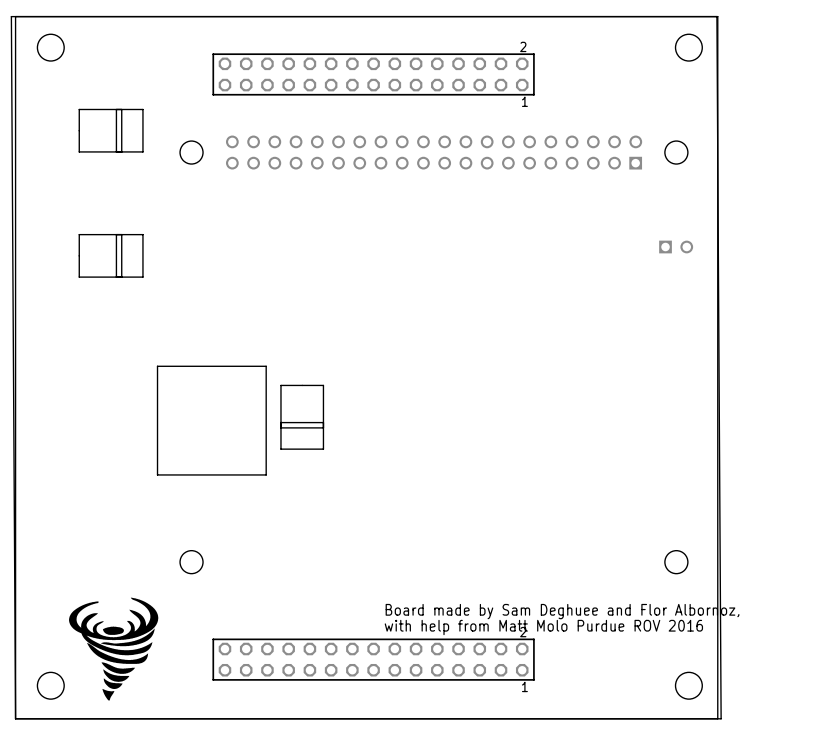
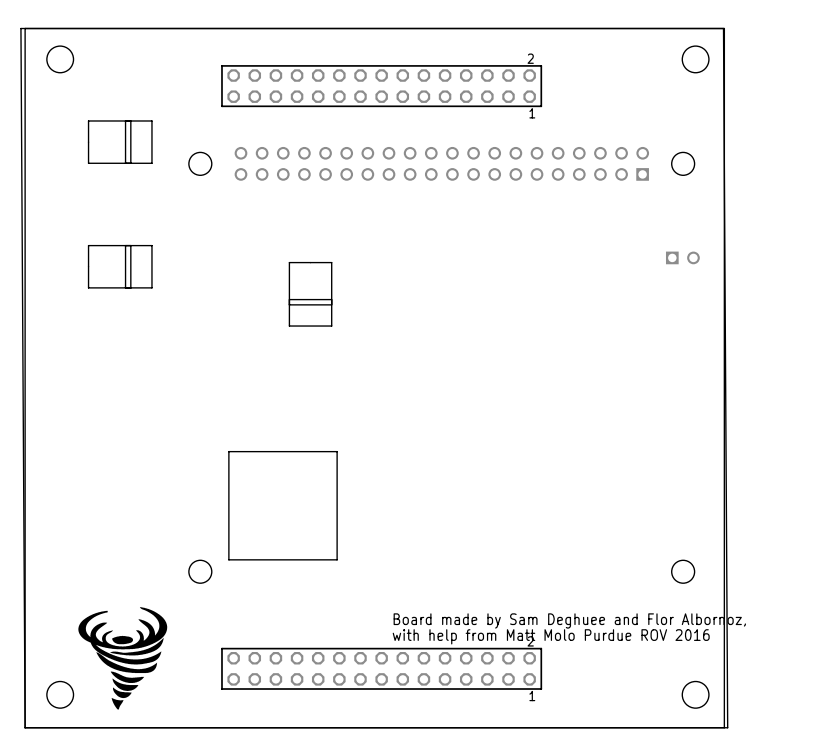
part position: (302, 417) -> (310, 294)
part position: (211, 420) -> (283, 505)

